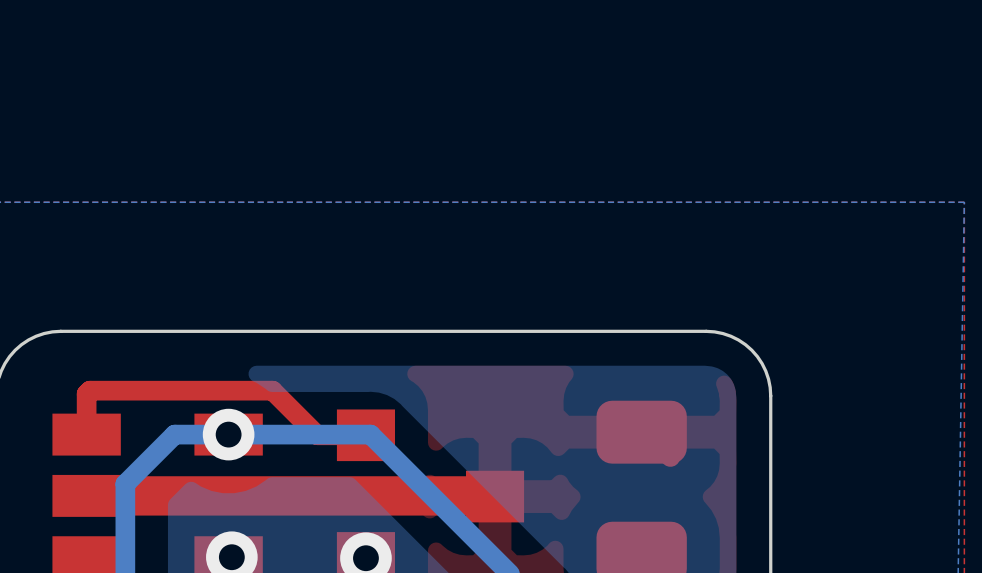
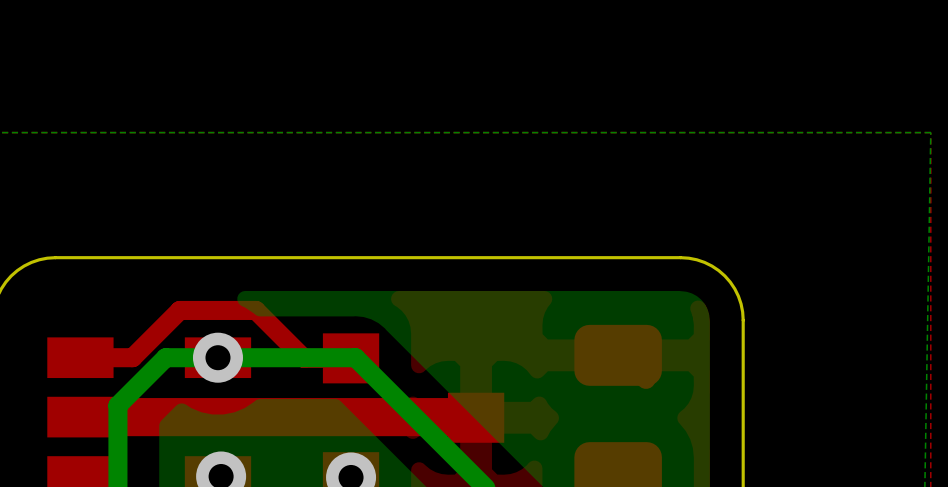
top track: (272, 390) (89, 390) (86, 393) (86, 434) -> (260, 315) (255, 310) (179, 310) (132, 357) (80, 357)

